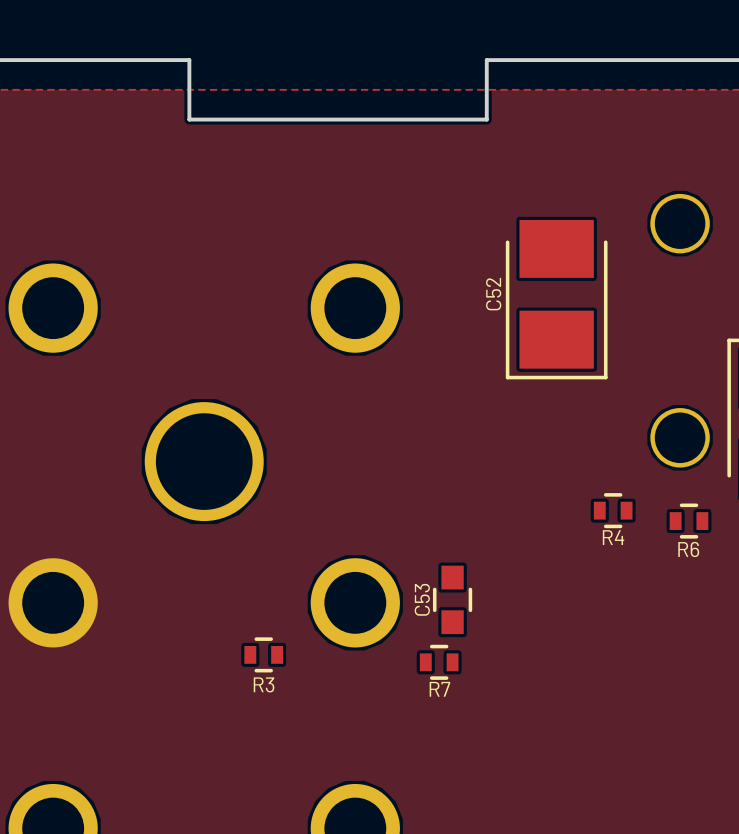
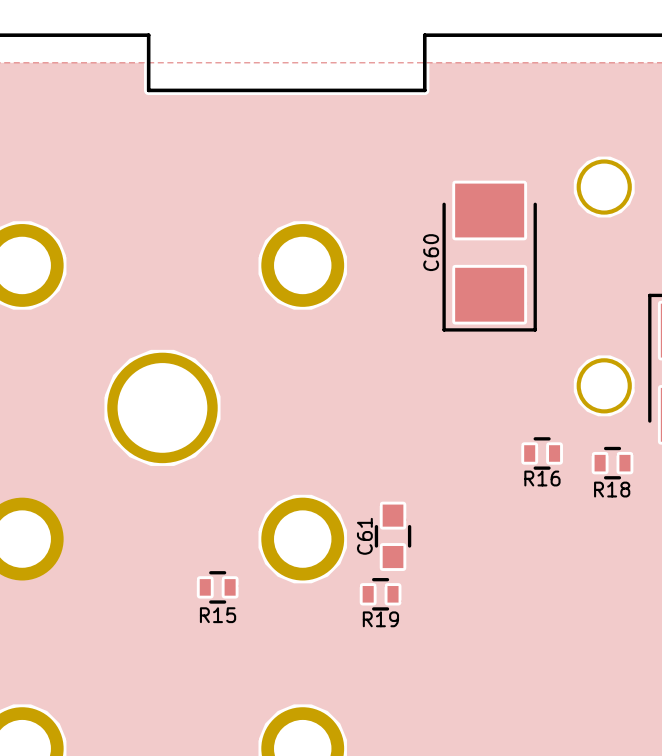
C52 name: C52 (493, 294) -> C60 (431, 252)
R4 name: R4 (613, 537) -> R16 (542, 478)
R6 name: R6 (688, 549) -> R18 (612, 489)
C53 name: C53 (422, 599) -> C61 (364, 536)
R3 name: R3 (264, 684) -> R15 (218, 615)
R7 name: R7 (439, 689) -> R19 (380, 619)

